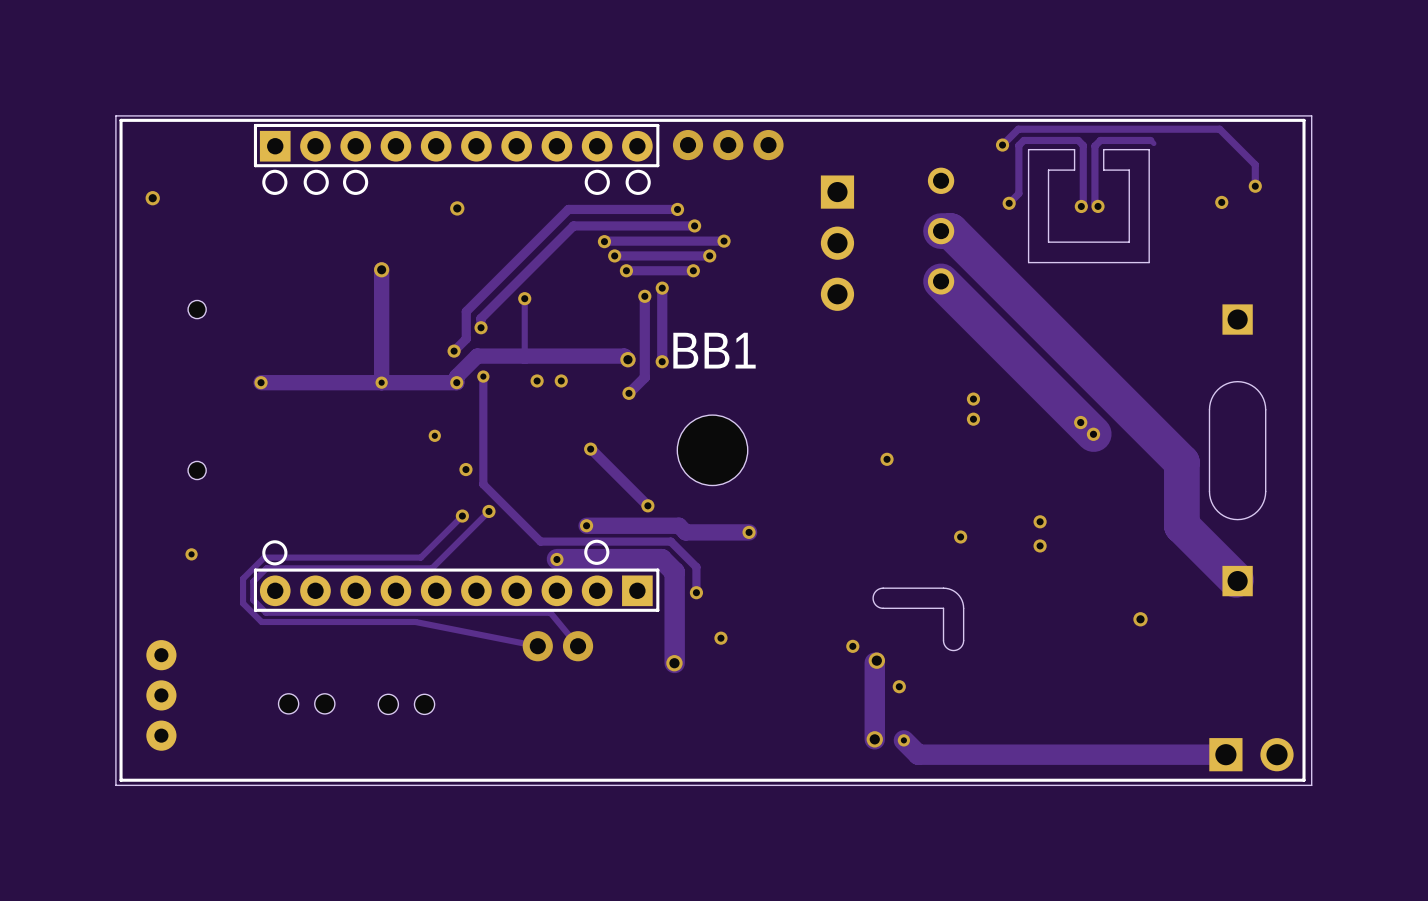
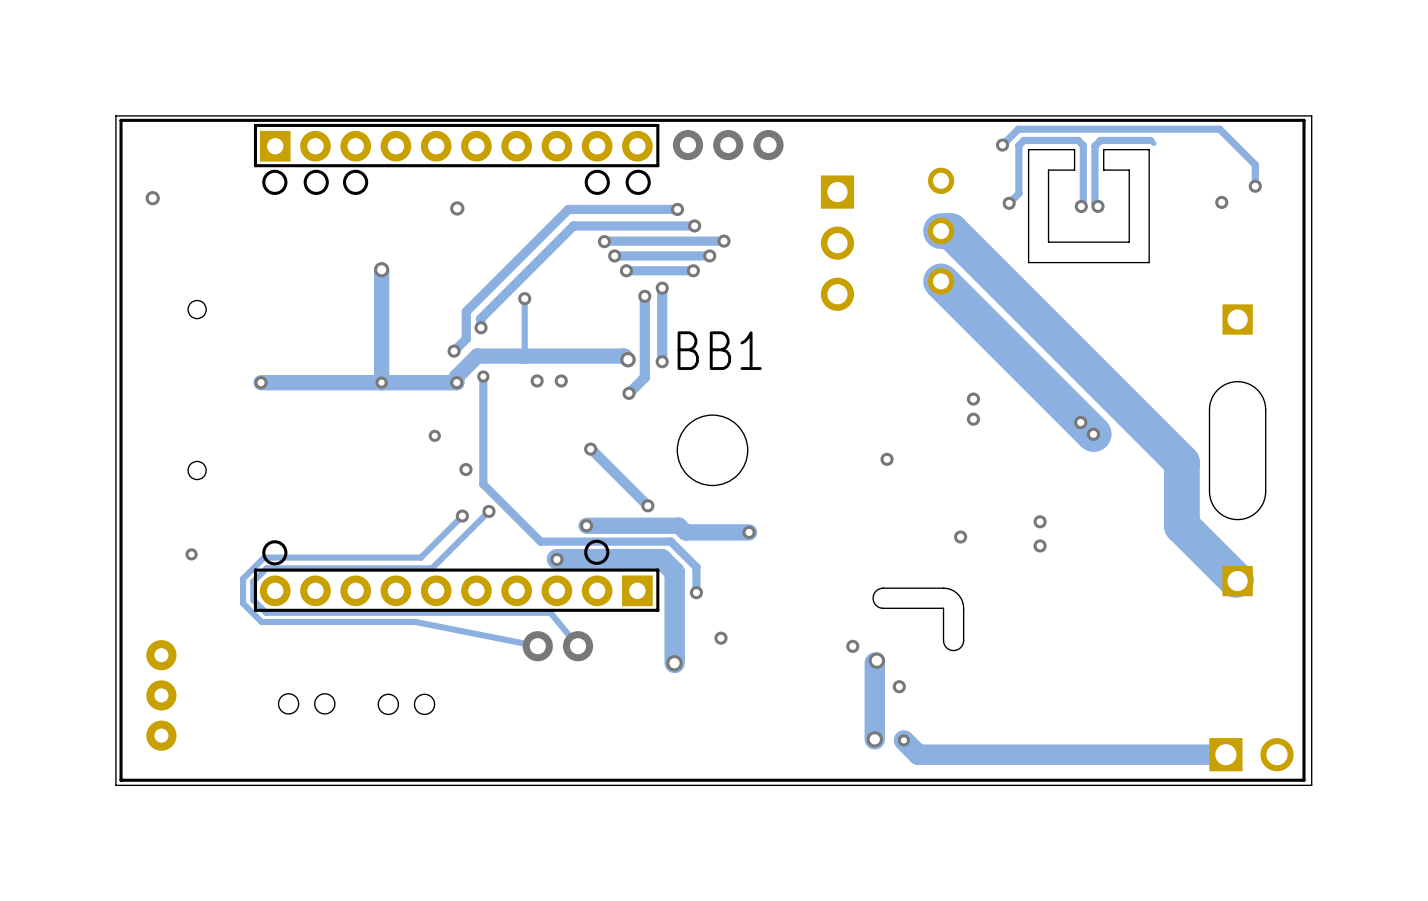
via: (1140, 619) -> none

